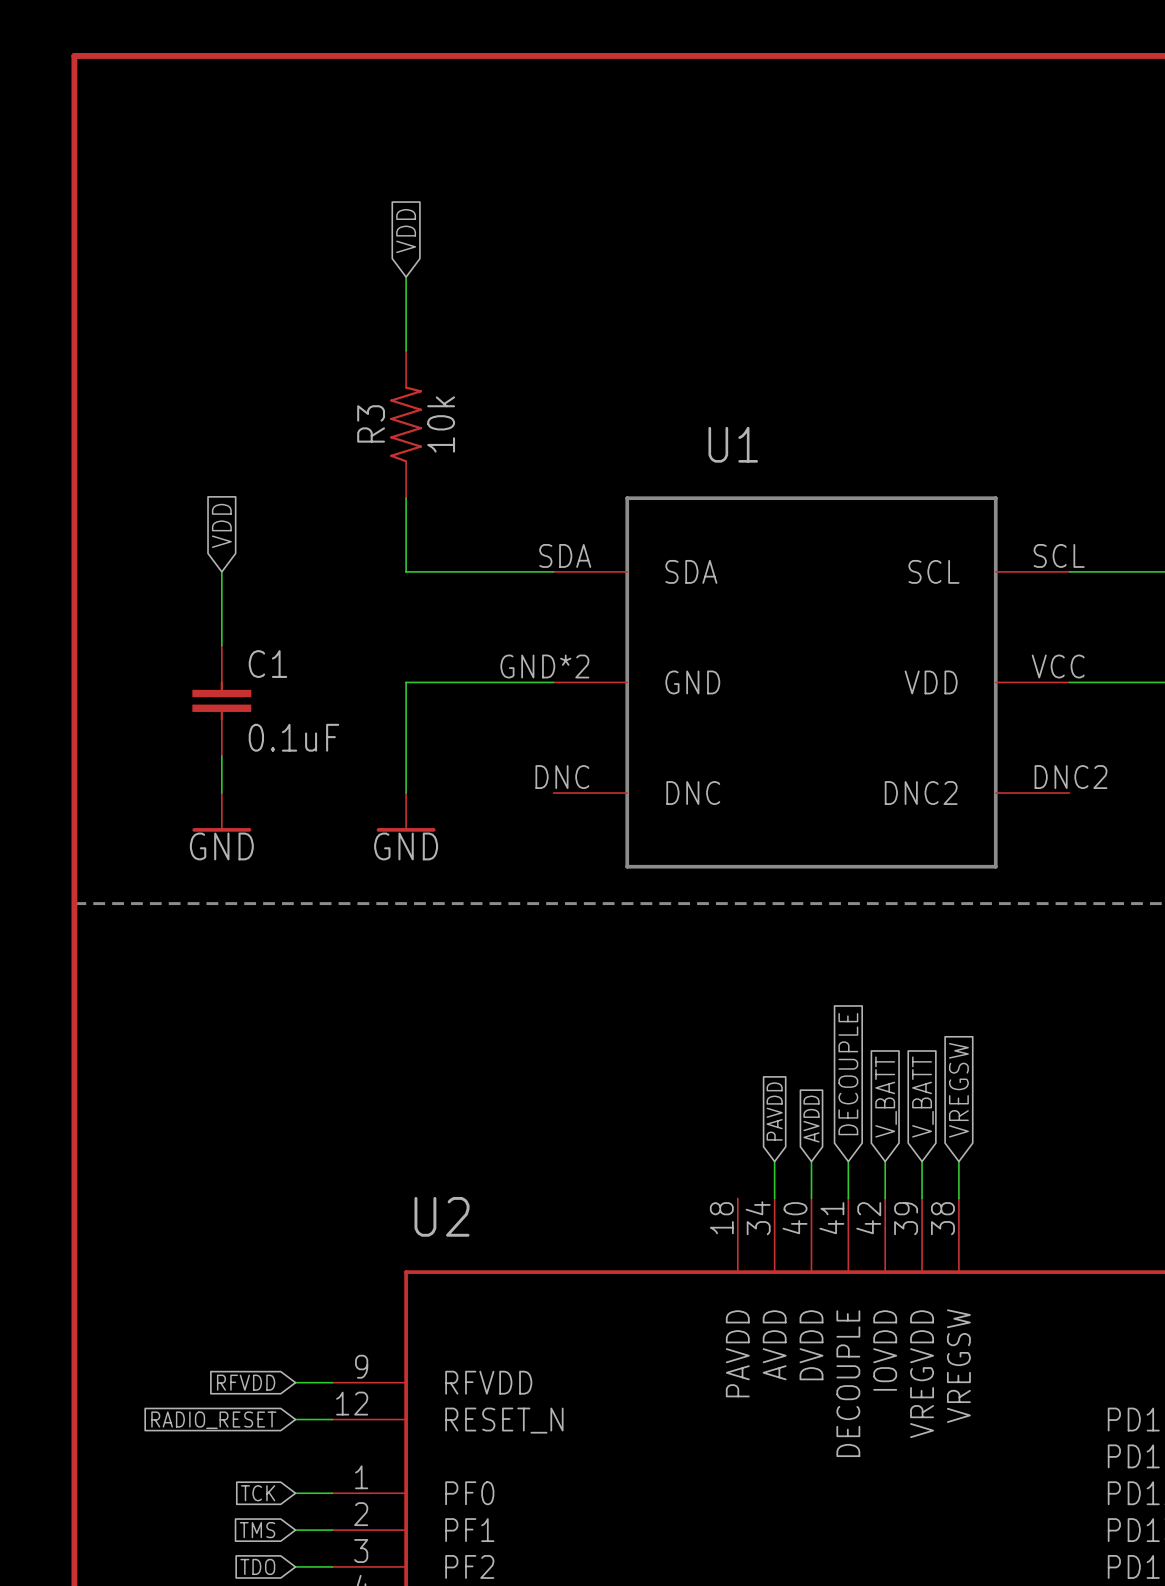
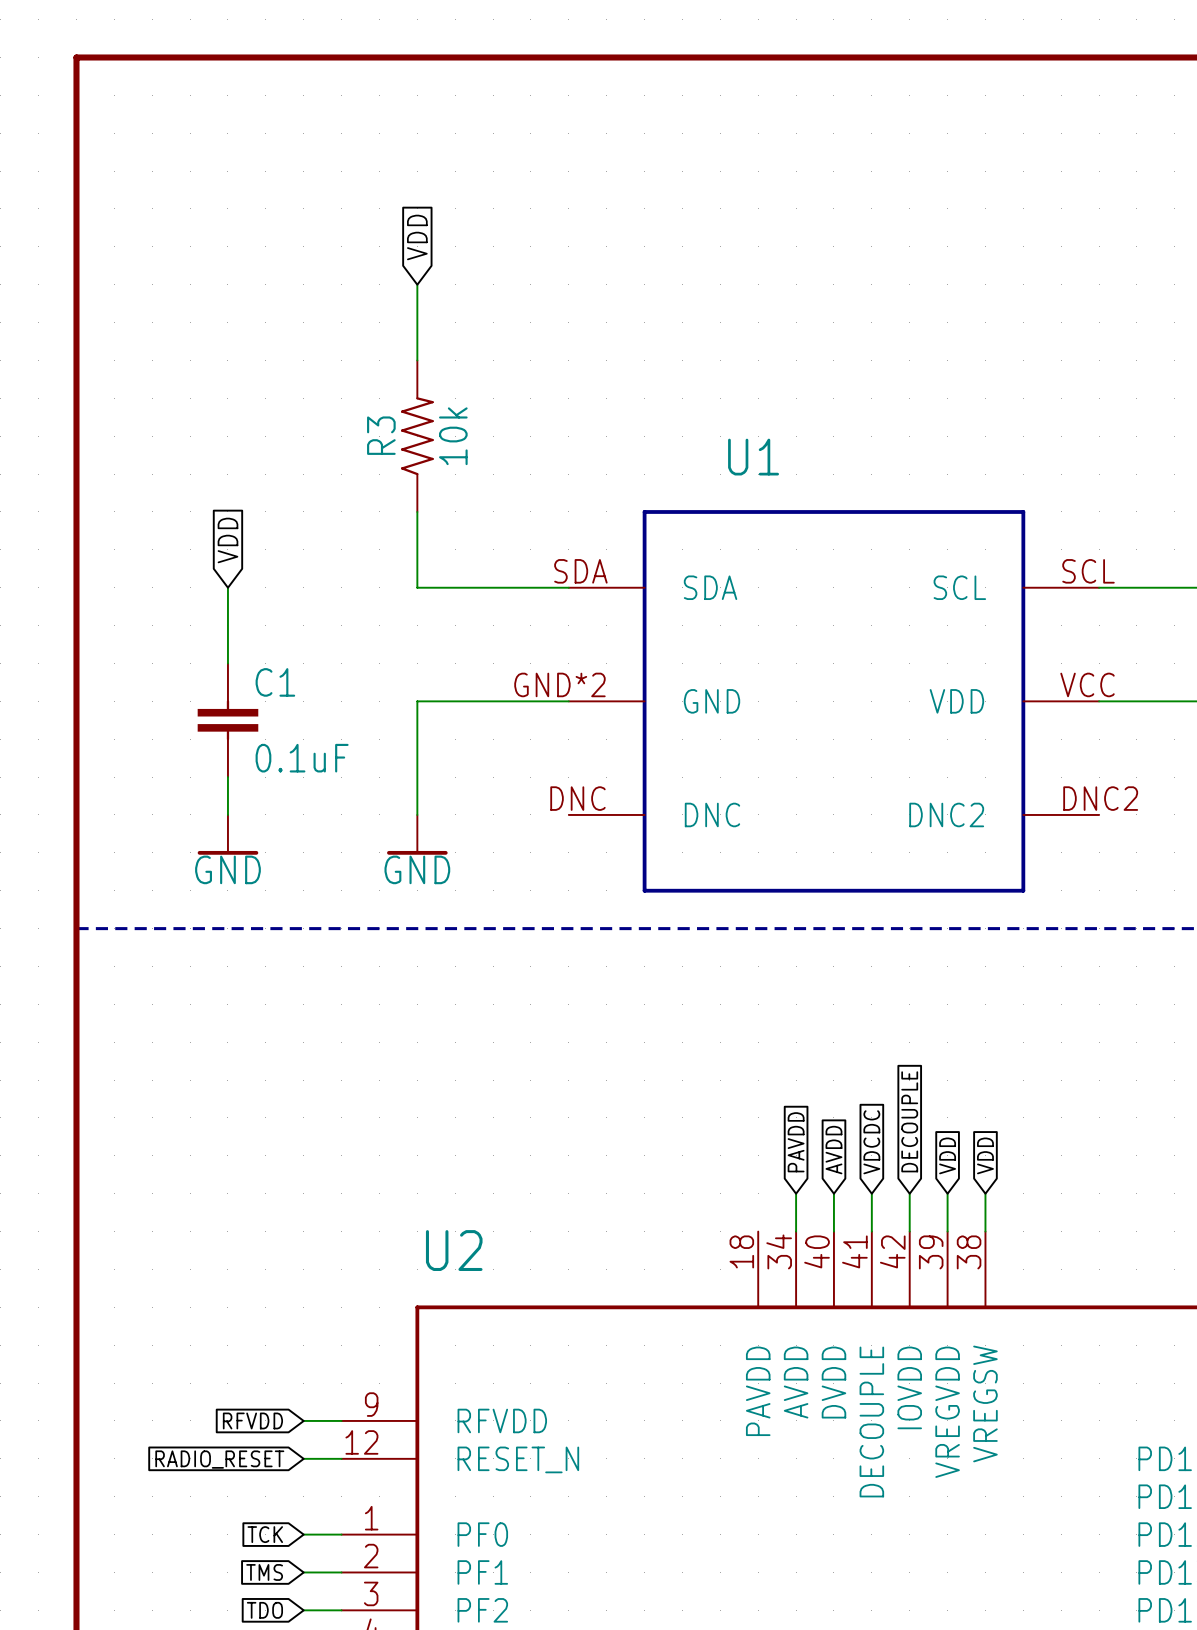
global label: DECOUPLE (848, 1074) -> VDCDC (871, 1142)
global label: VREGSW (958, 1090) -> VDD (985, 1155)
global label: V_BATT (886, 1097) -> DECOUPLE (909, 1121)
global label: V_BATT (922, 1097) -> VDD (947, 1155)

